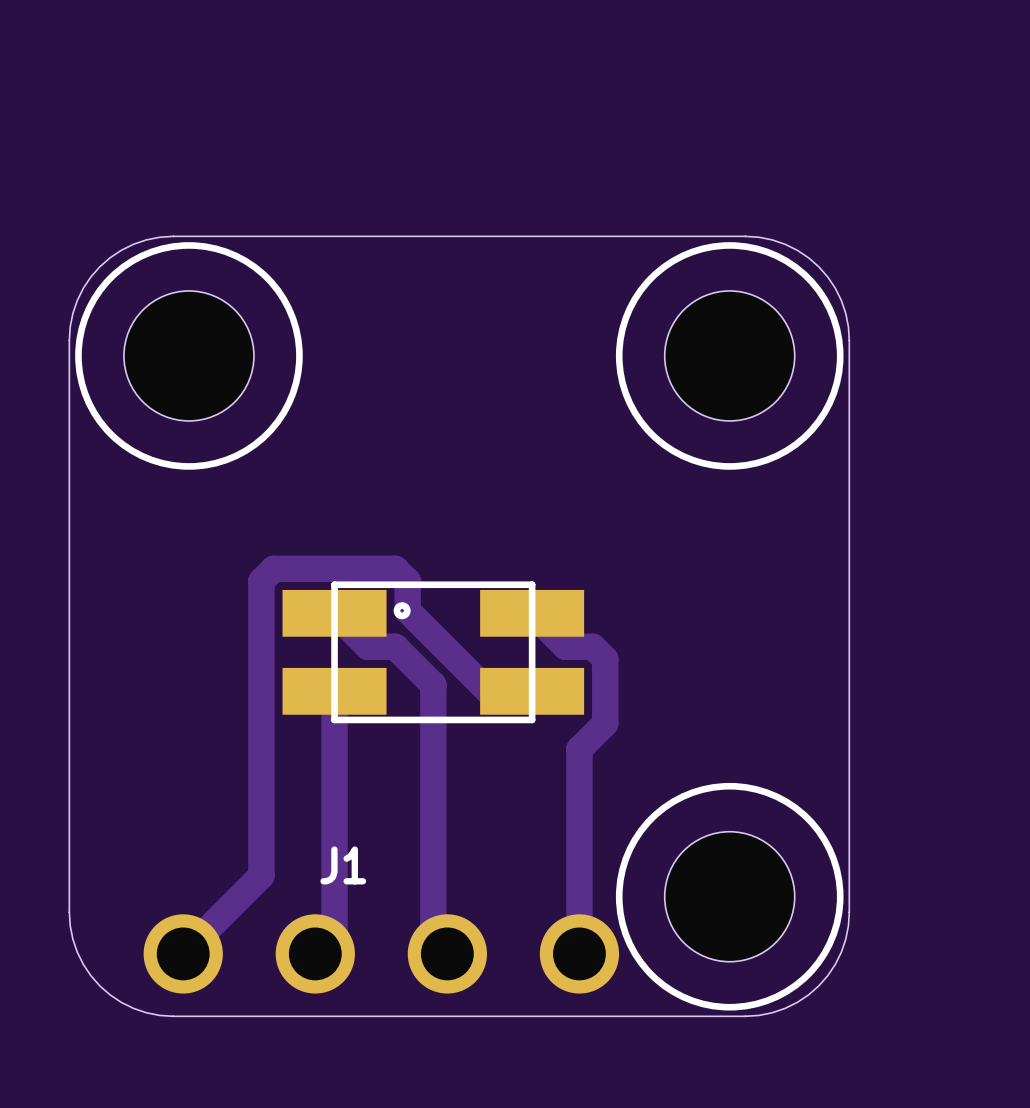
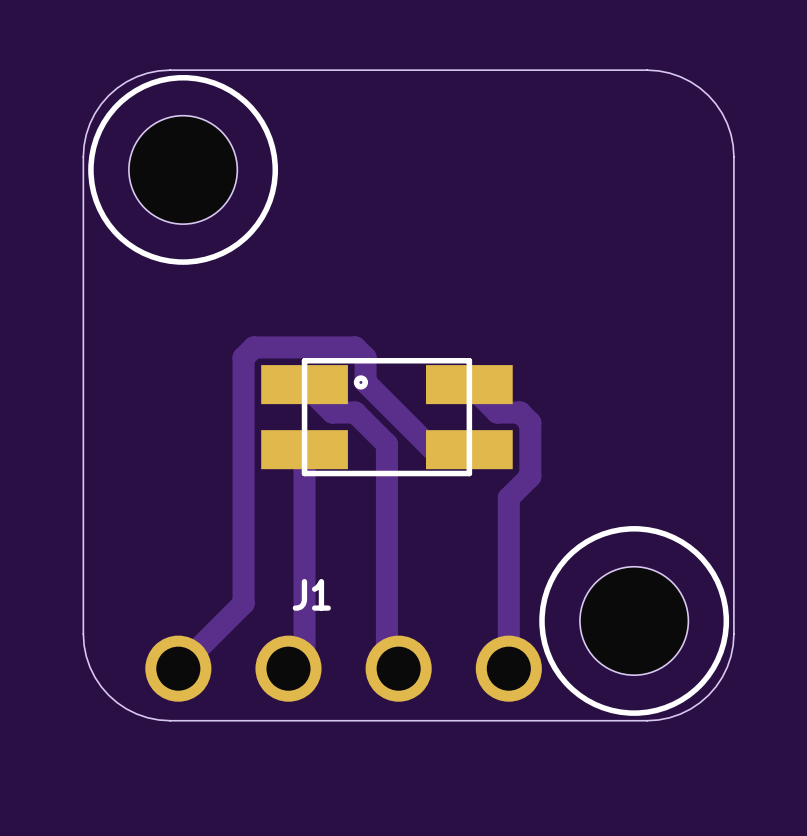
part: (729, 355) -> none

